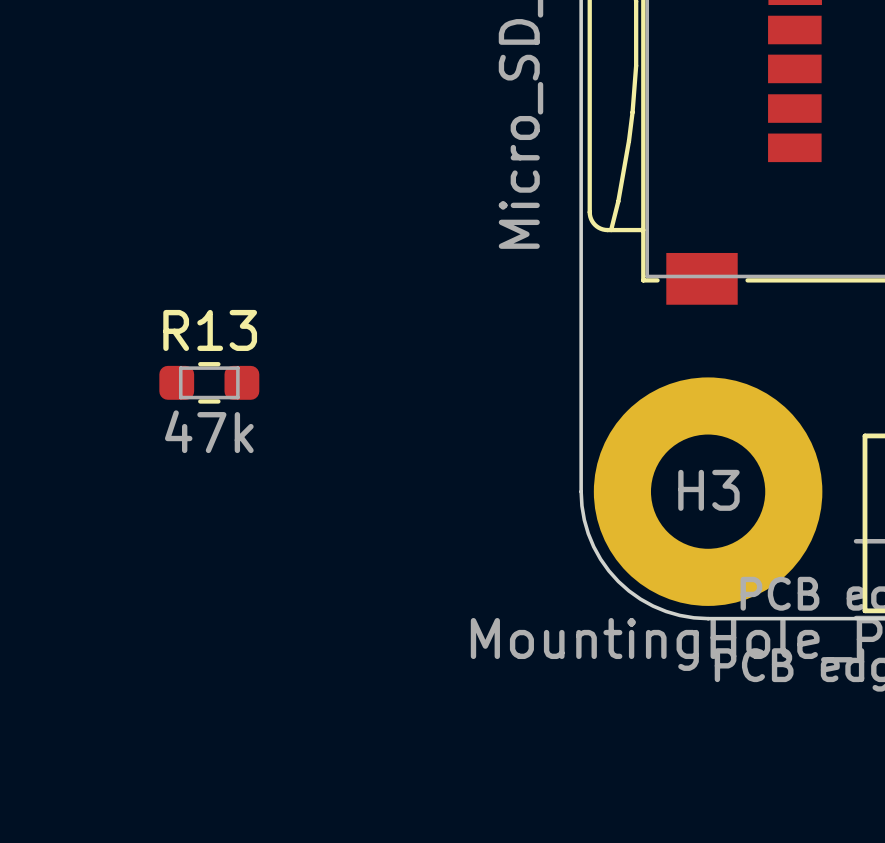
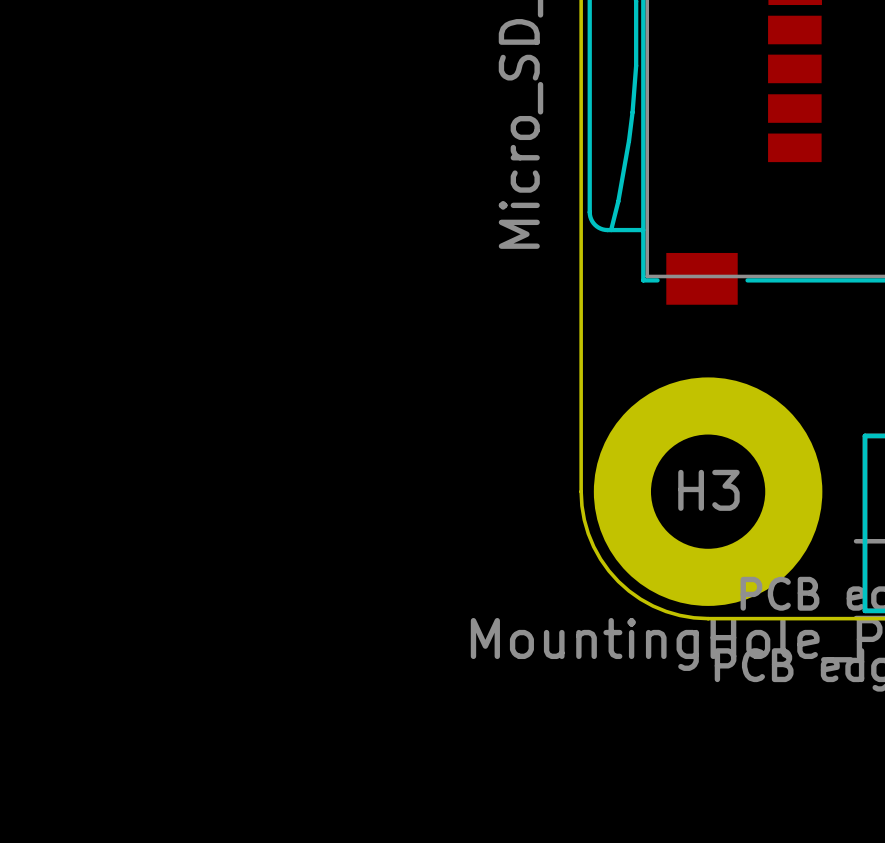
R13: 47k (209, 382) -> none

